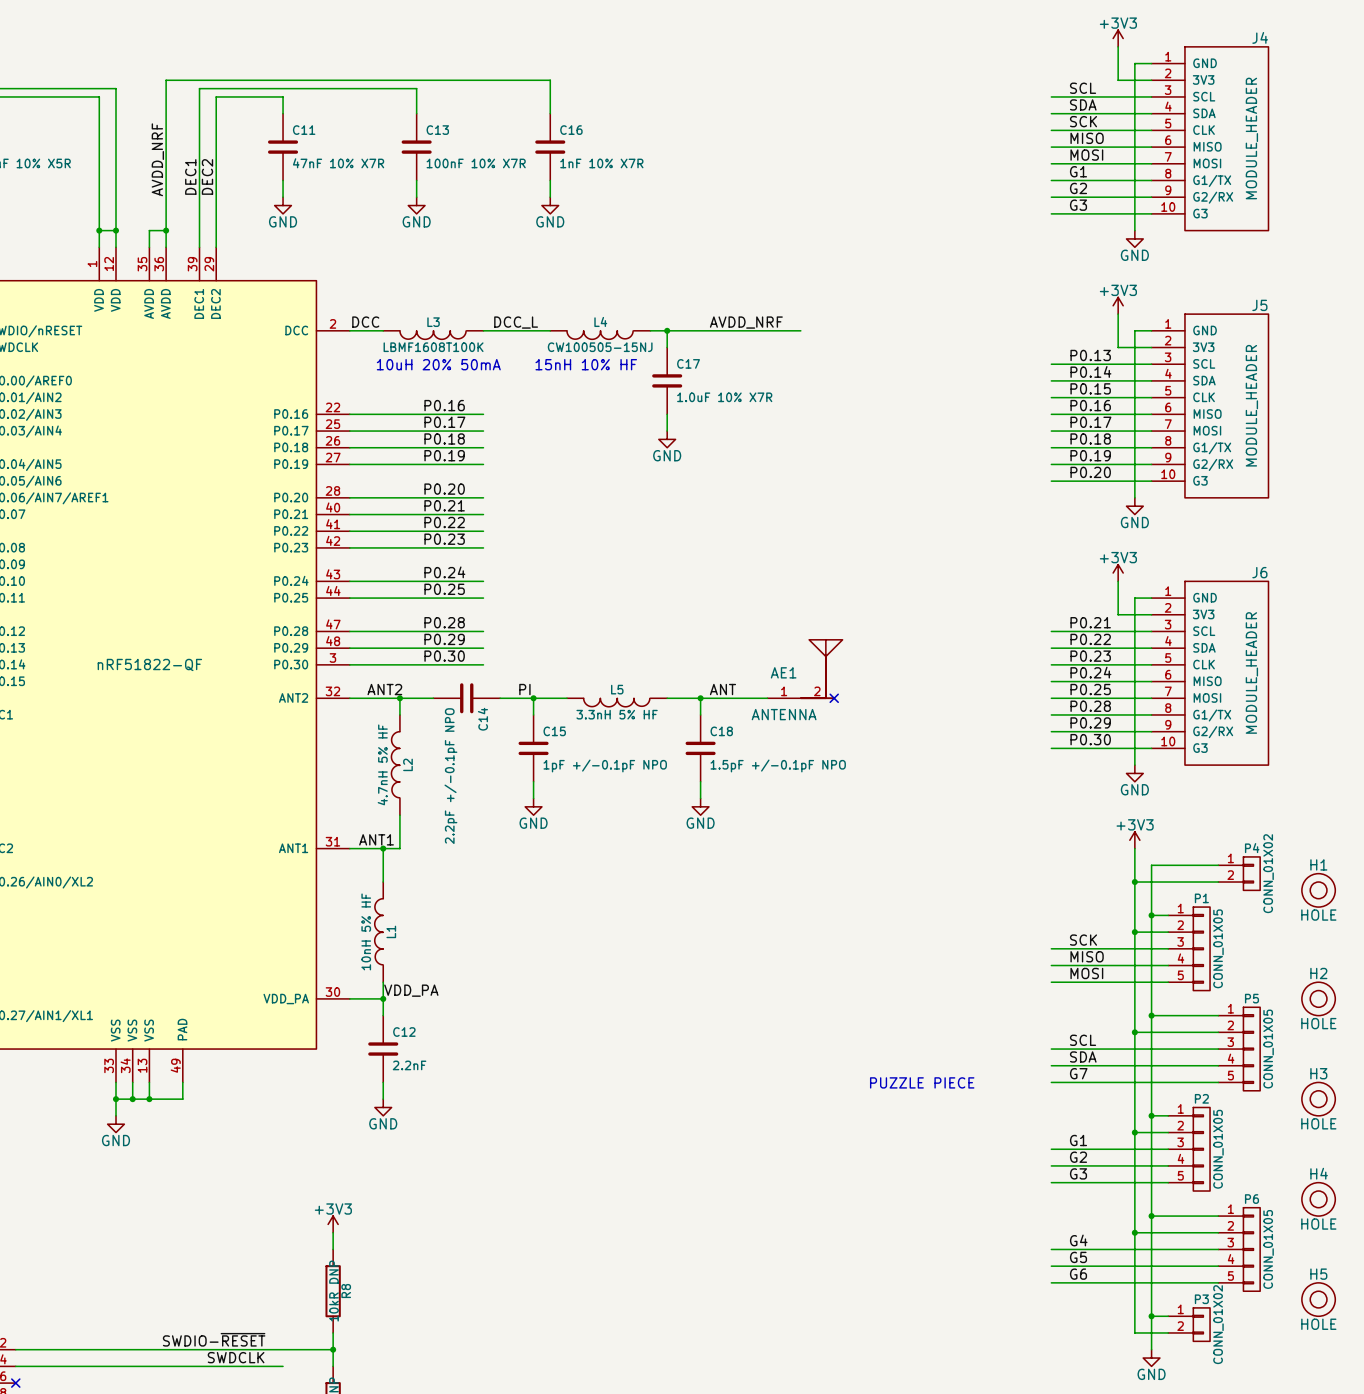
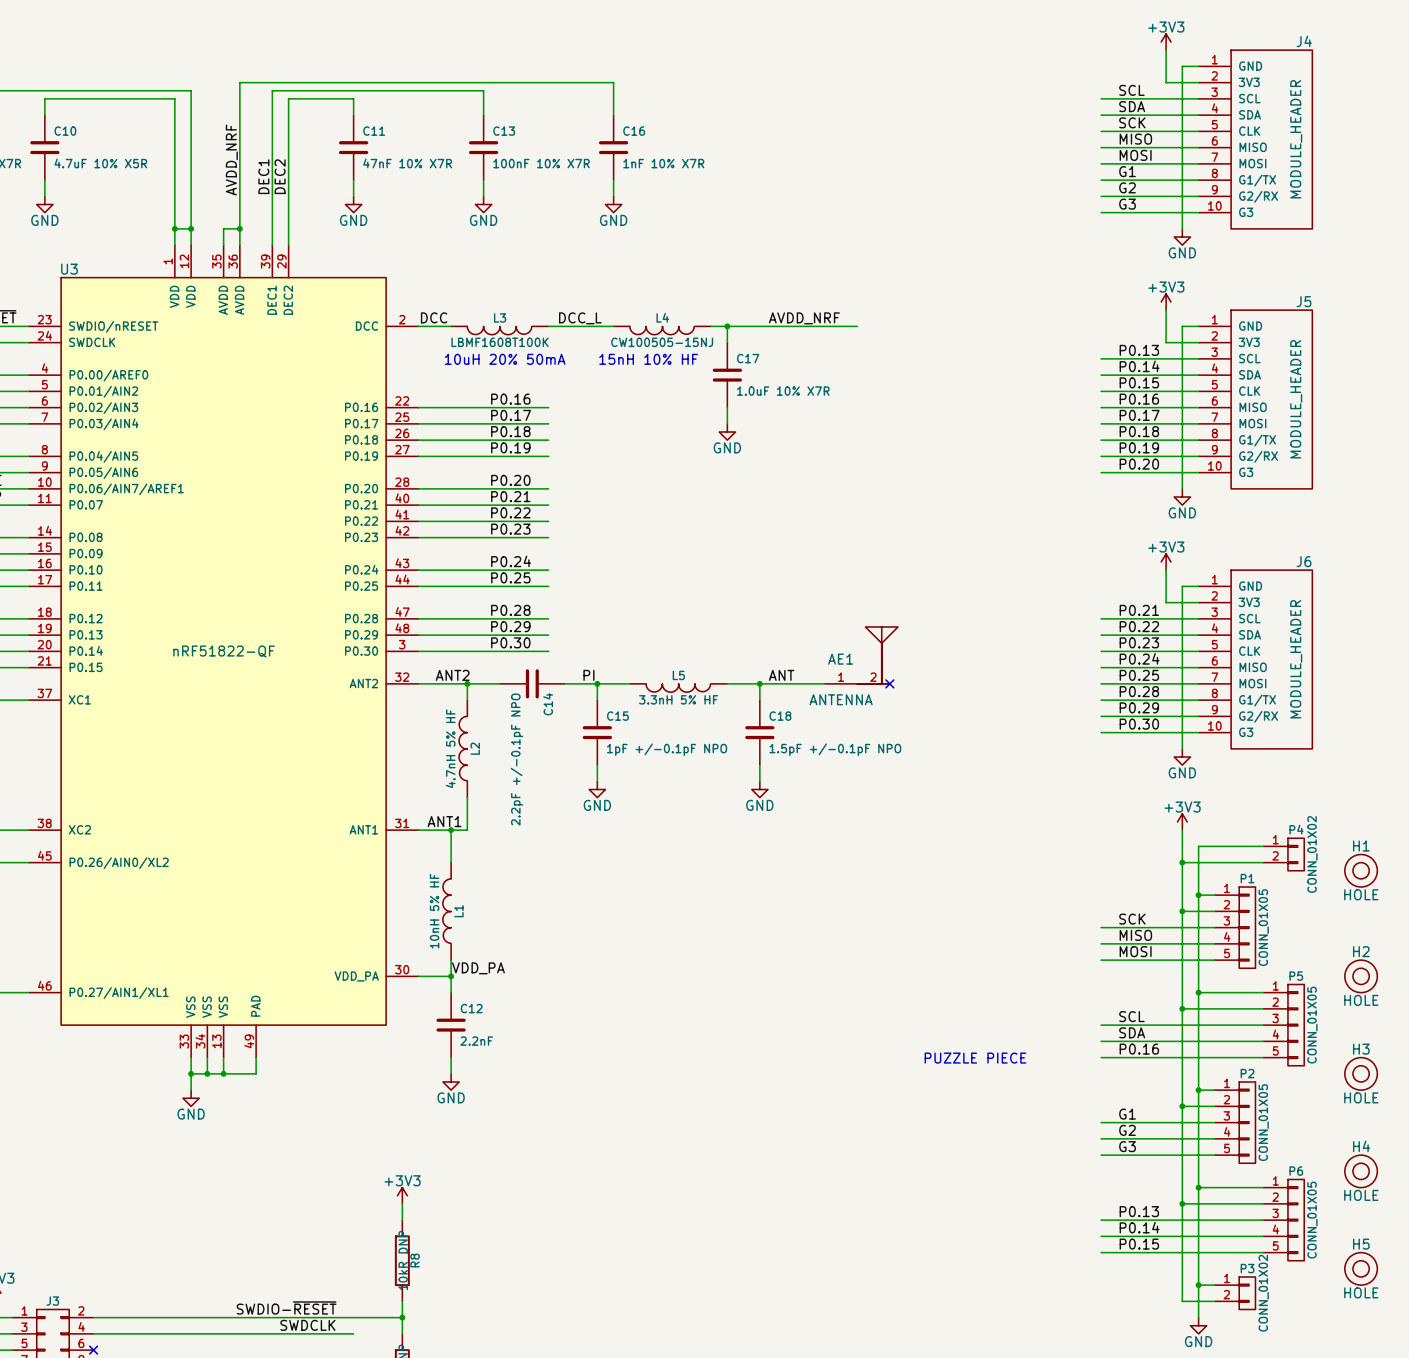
label: G7 (1078, 1073) -> P0.16 (1139, 1049)
label: G4 (1078, 1240) -> P0.13 (1139, 1211)
label: G5 (1078, 1257) -> P0.14 (1139, 1227)
label: G6 (1078, 1274) -> P0.15 (1139, 1244)

